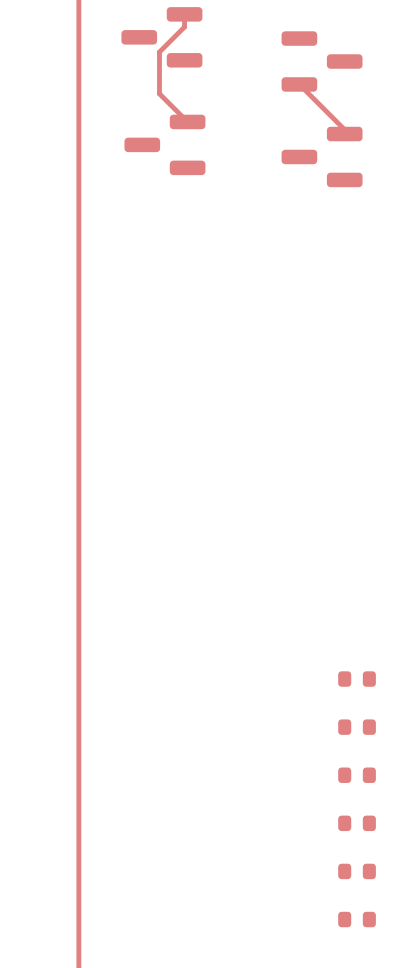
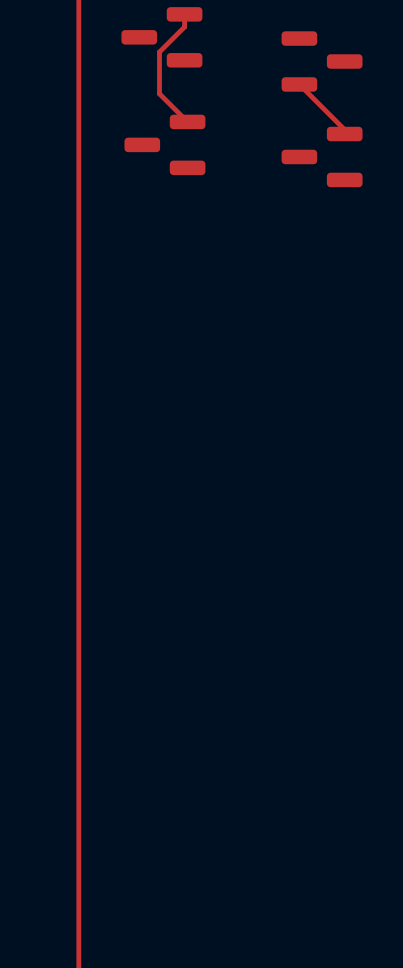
part: (357, 679) -> none
part: (357, 727) -> none
part: (357, 775) -> none
part: (357, 823) -> none
part: (357, 871) -> none
part: (357, 919) -> none

